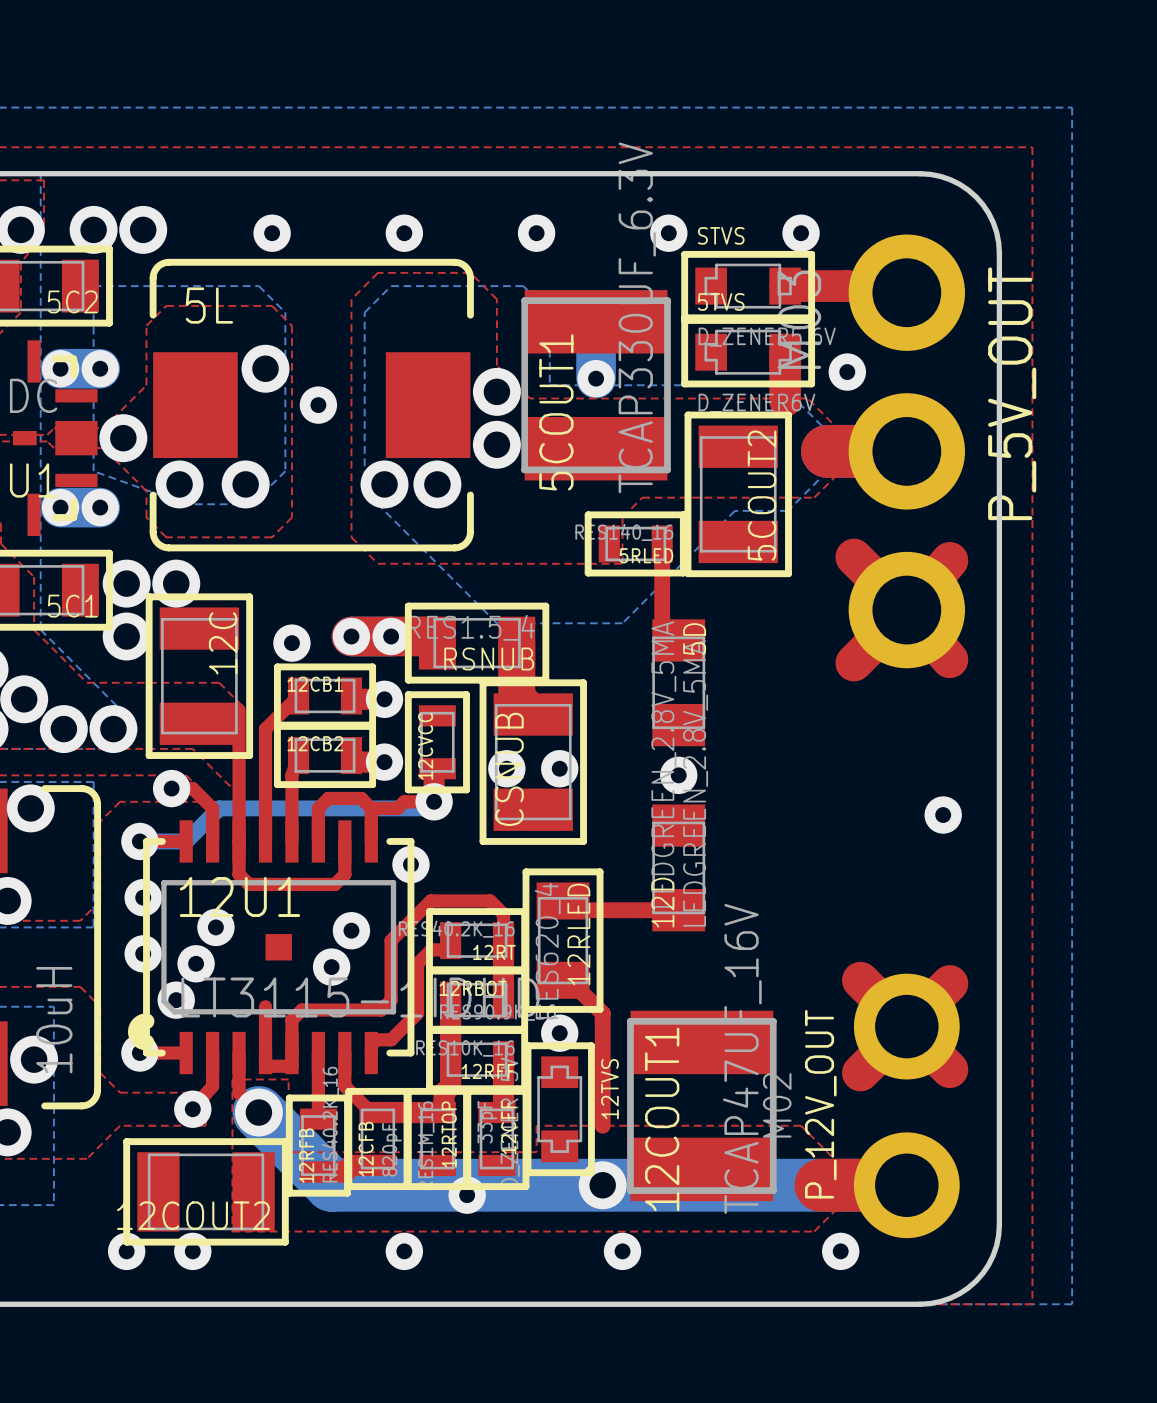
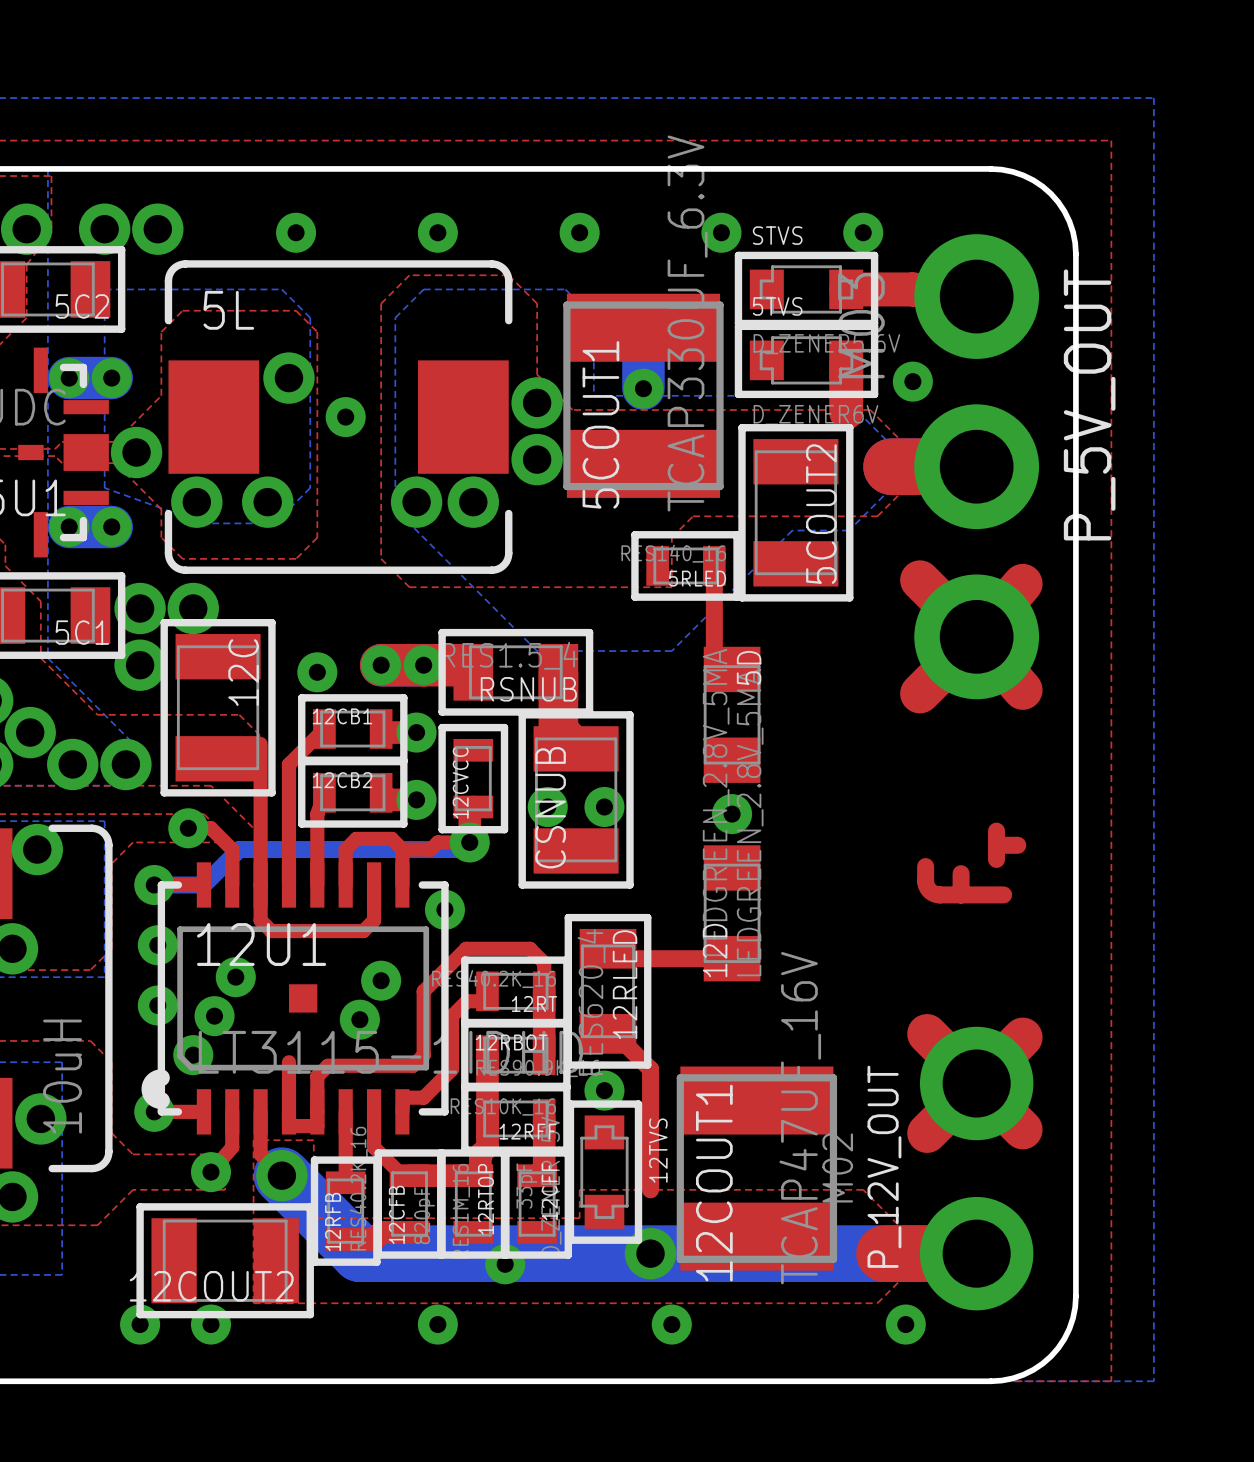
drawing: none -> [917, 822, 1027, 904]
via: (943, 815) -> none

